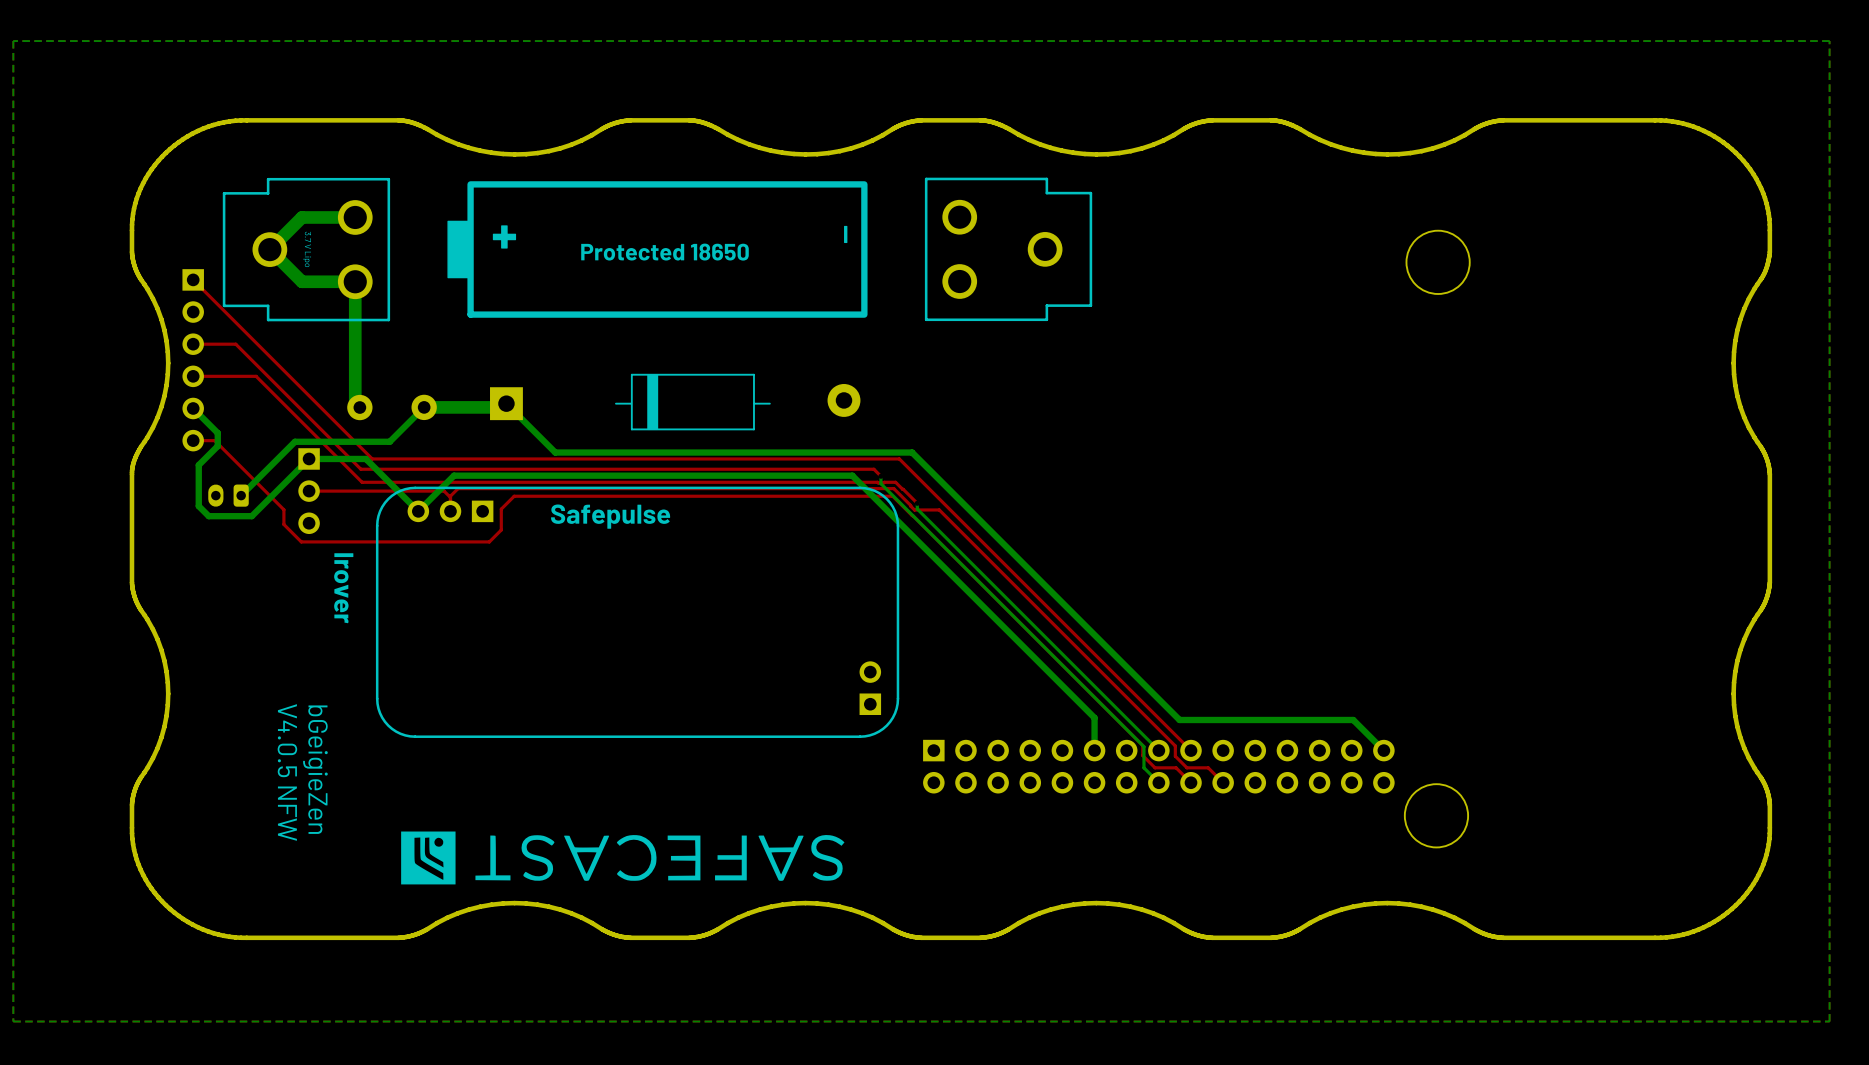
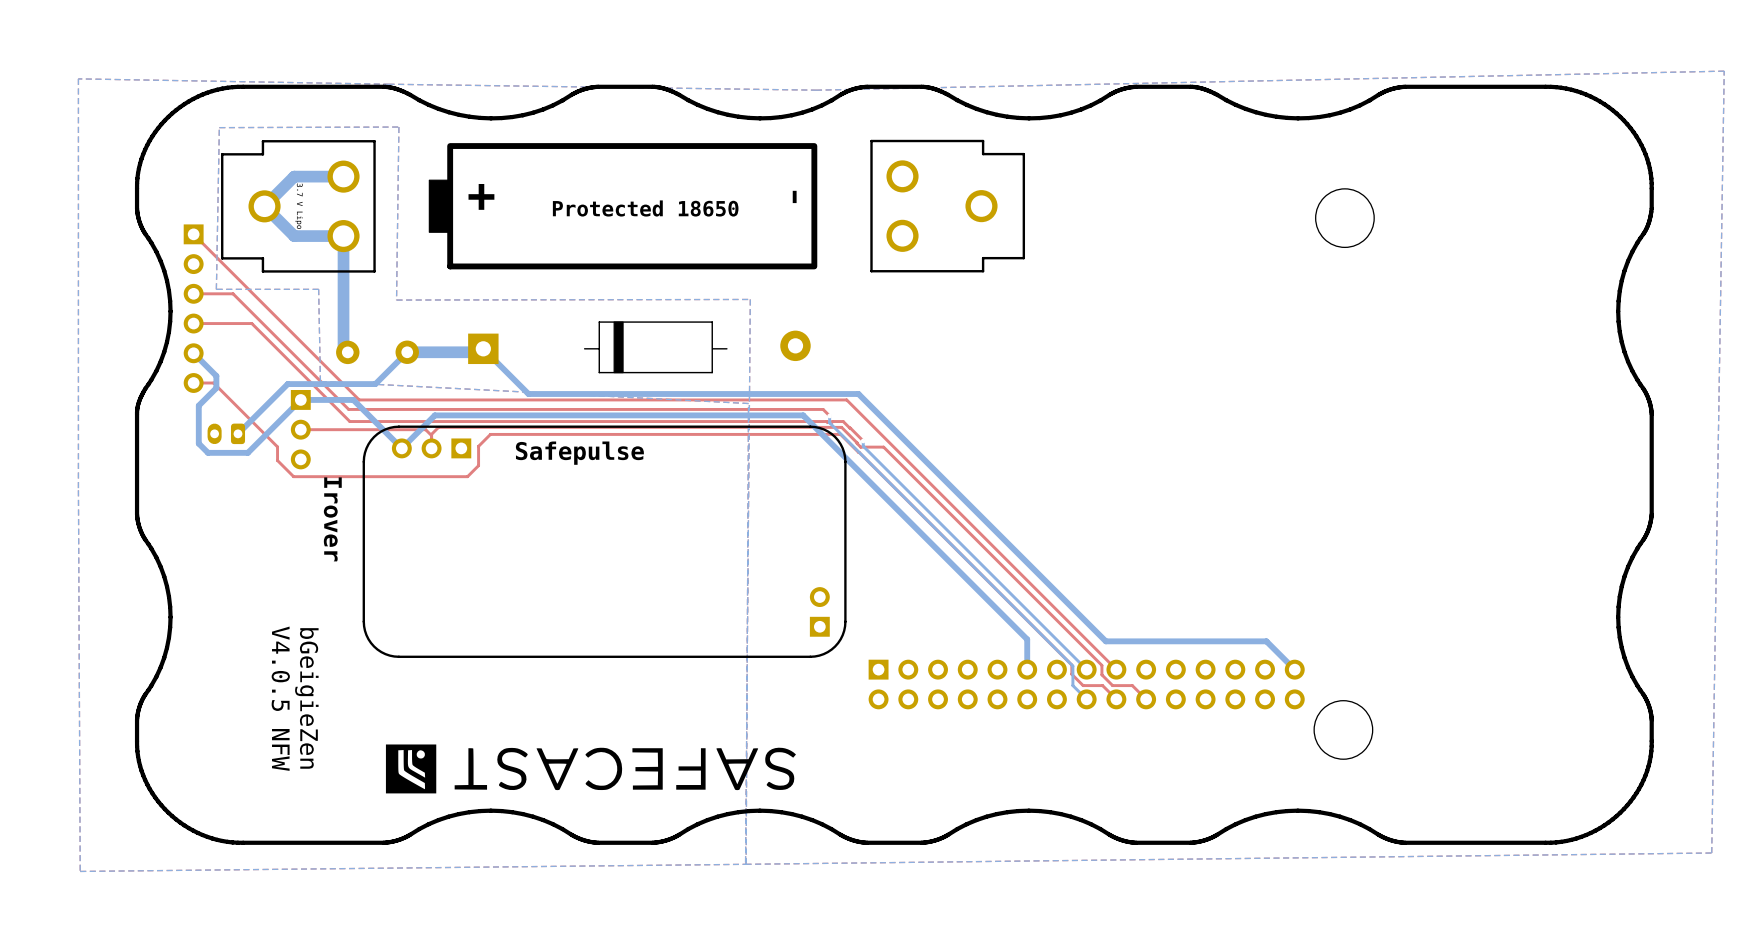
bottom zone outline: (1829, 41) (1829, 1021) (13, 1021) (13, 41) (1829, 41) -> (1724, 71) (1711, 853) (745, 864) (750, 299) (396, 300) (398, 127) (219, 127) (216, 289) (318, 289) (320, 381) (748, 403) (746, 864) (80, 871) (78, 78) (816, 90) (1724, 71)

